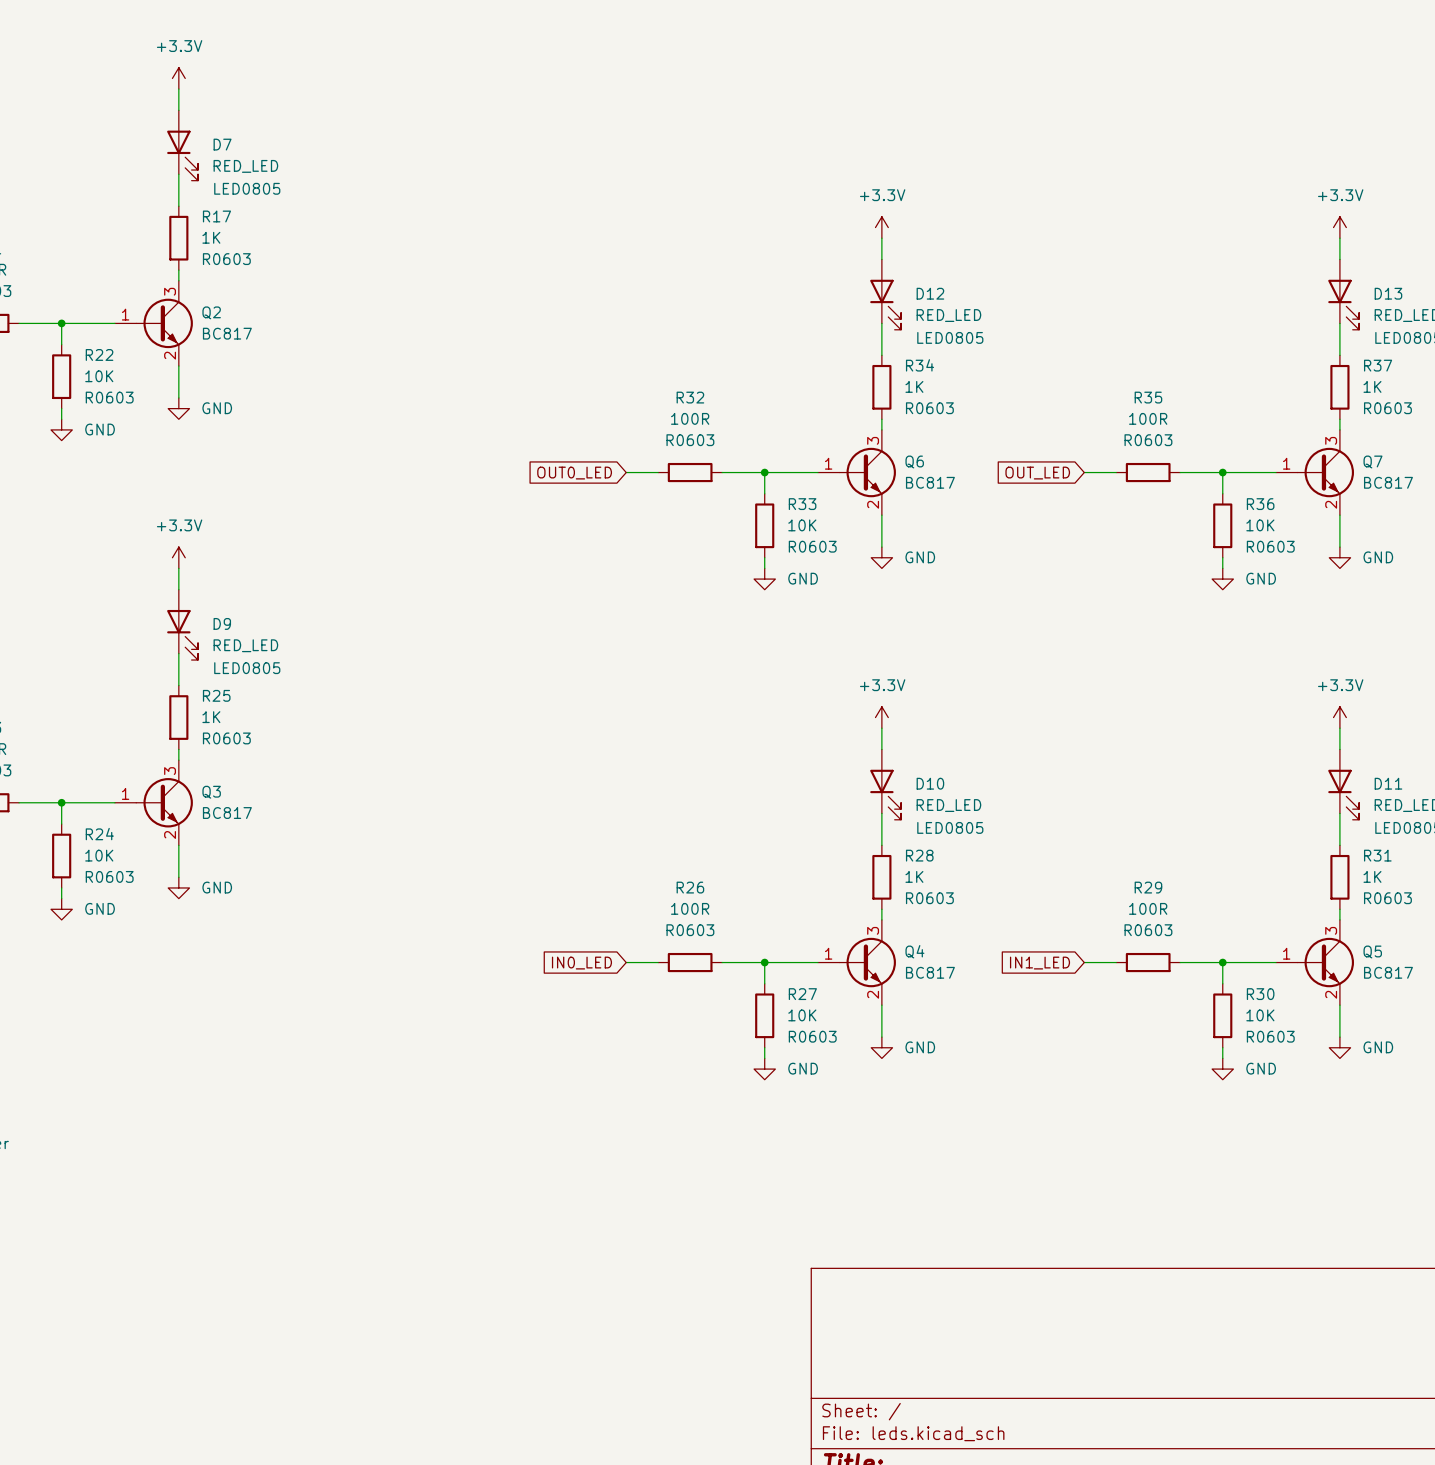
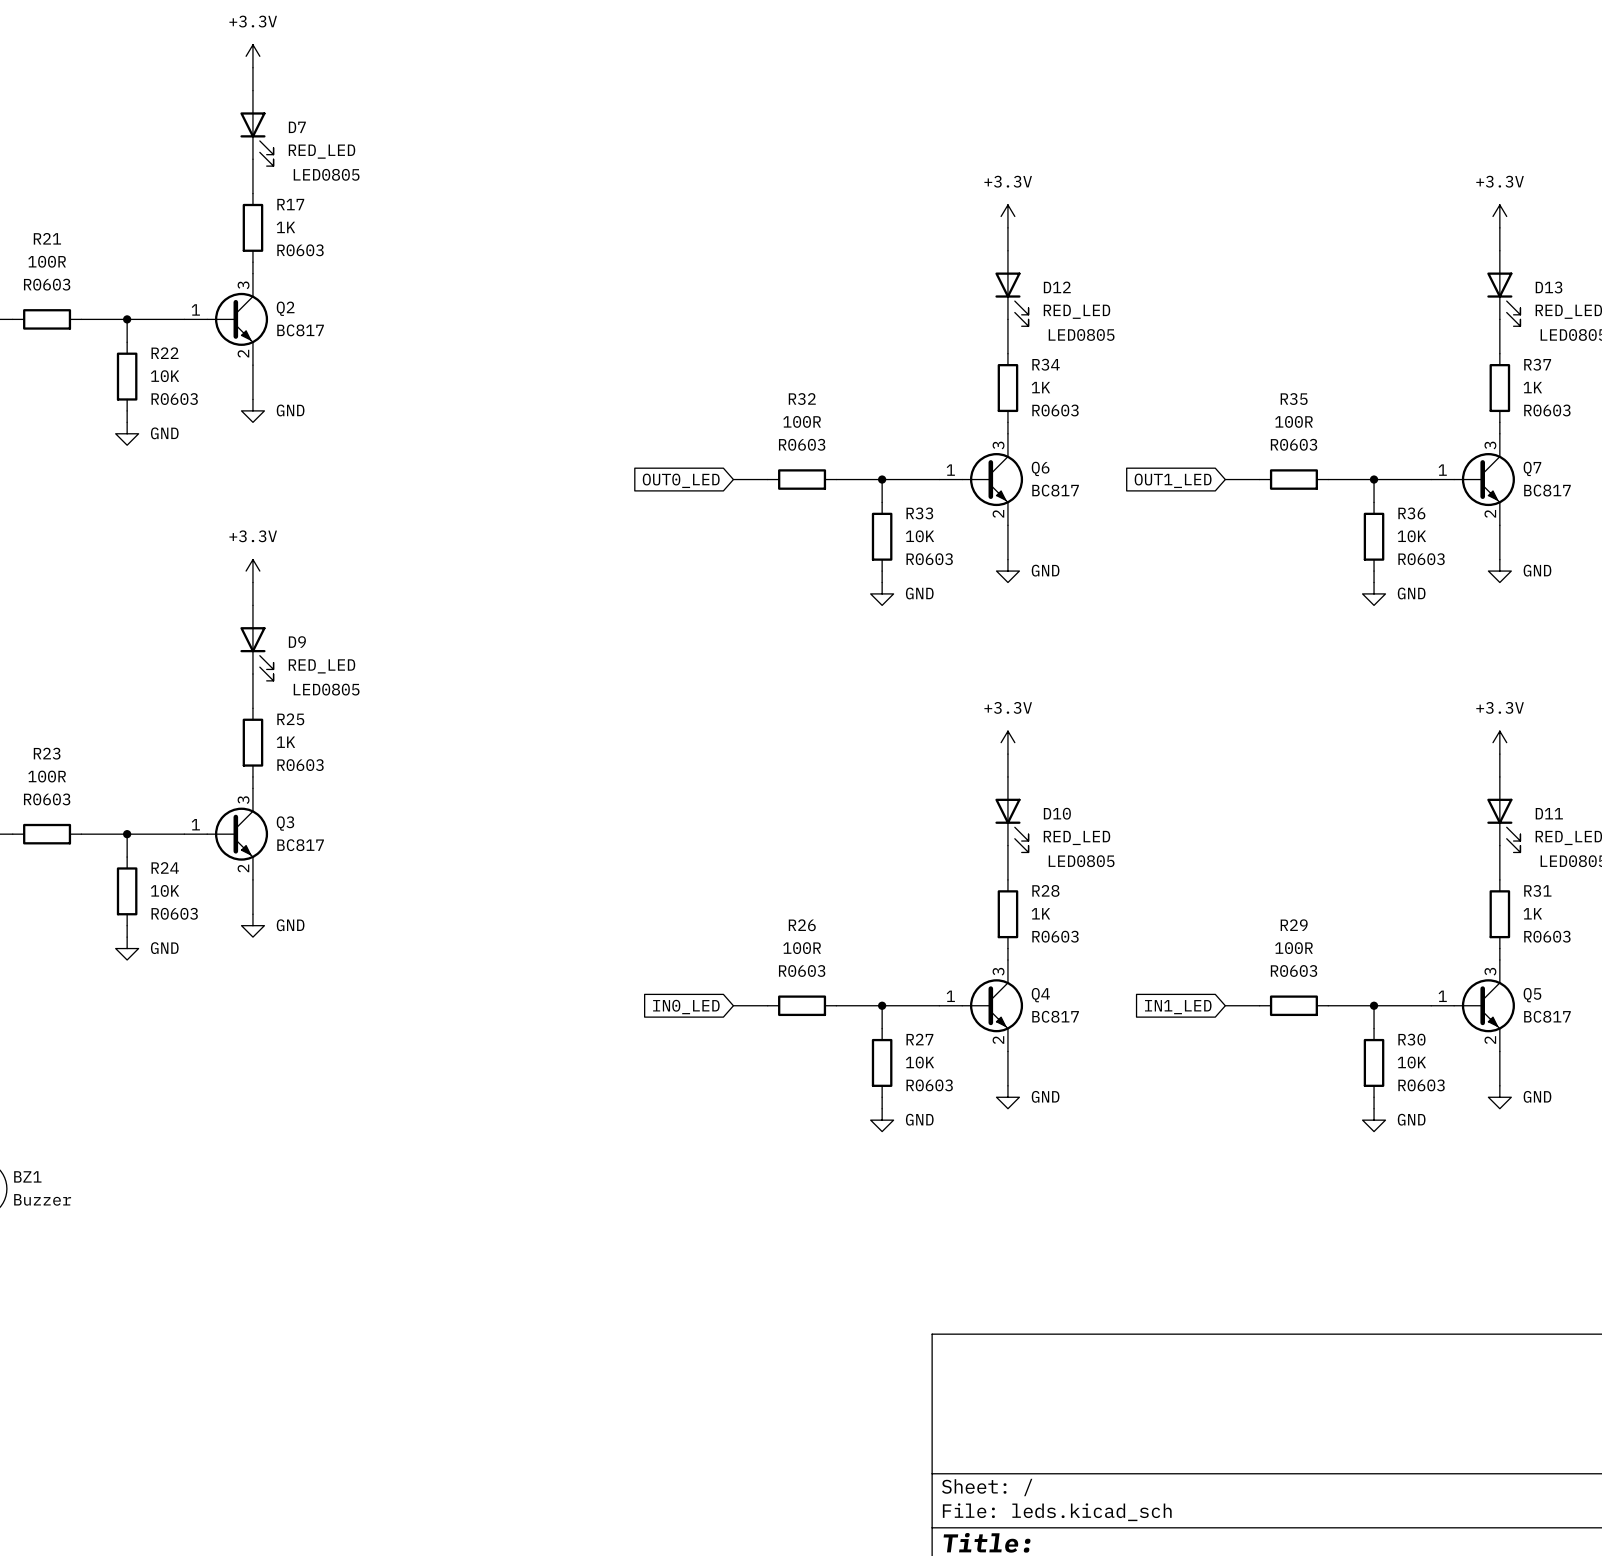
global label: OUT_LED (1037, 473) -> OUT1_LED (1173, 480)

